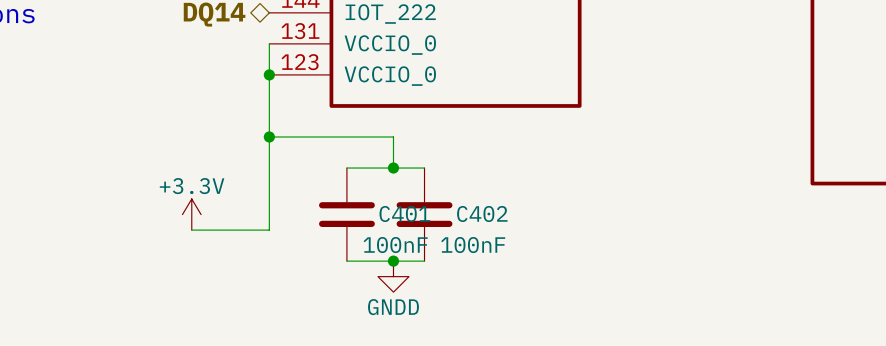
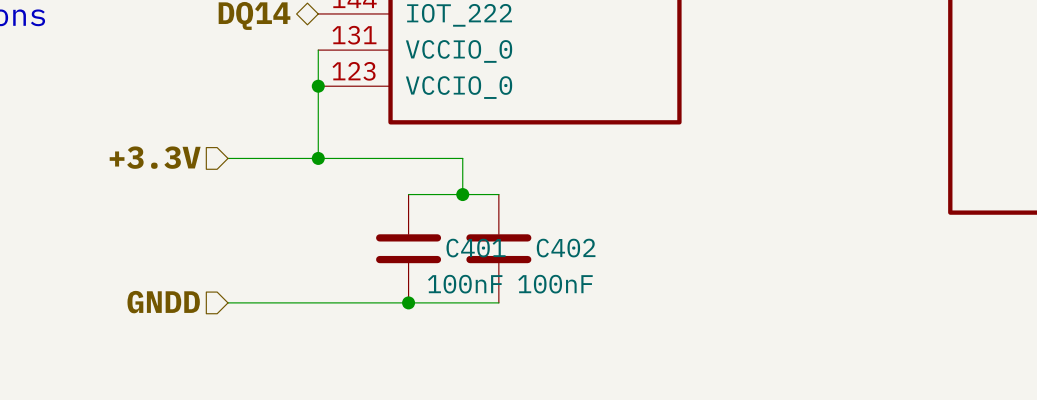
hierarchical label: none -> +3.3V (155, 157)
wire: (269, 136) (269, 230) (191, 230) -> (318, 158) (227, 158)
power symbol: +3.3V (191, 214) -> none
hierarchical label: none -> GNDD (163, 302)
wire: none -> (227, 302) (408, 302)
junction position: (393, 261) -> (408, 302)
power symbol: GNDD (393, 276) -> none

